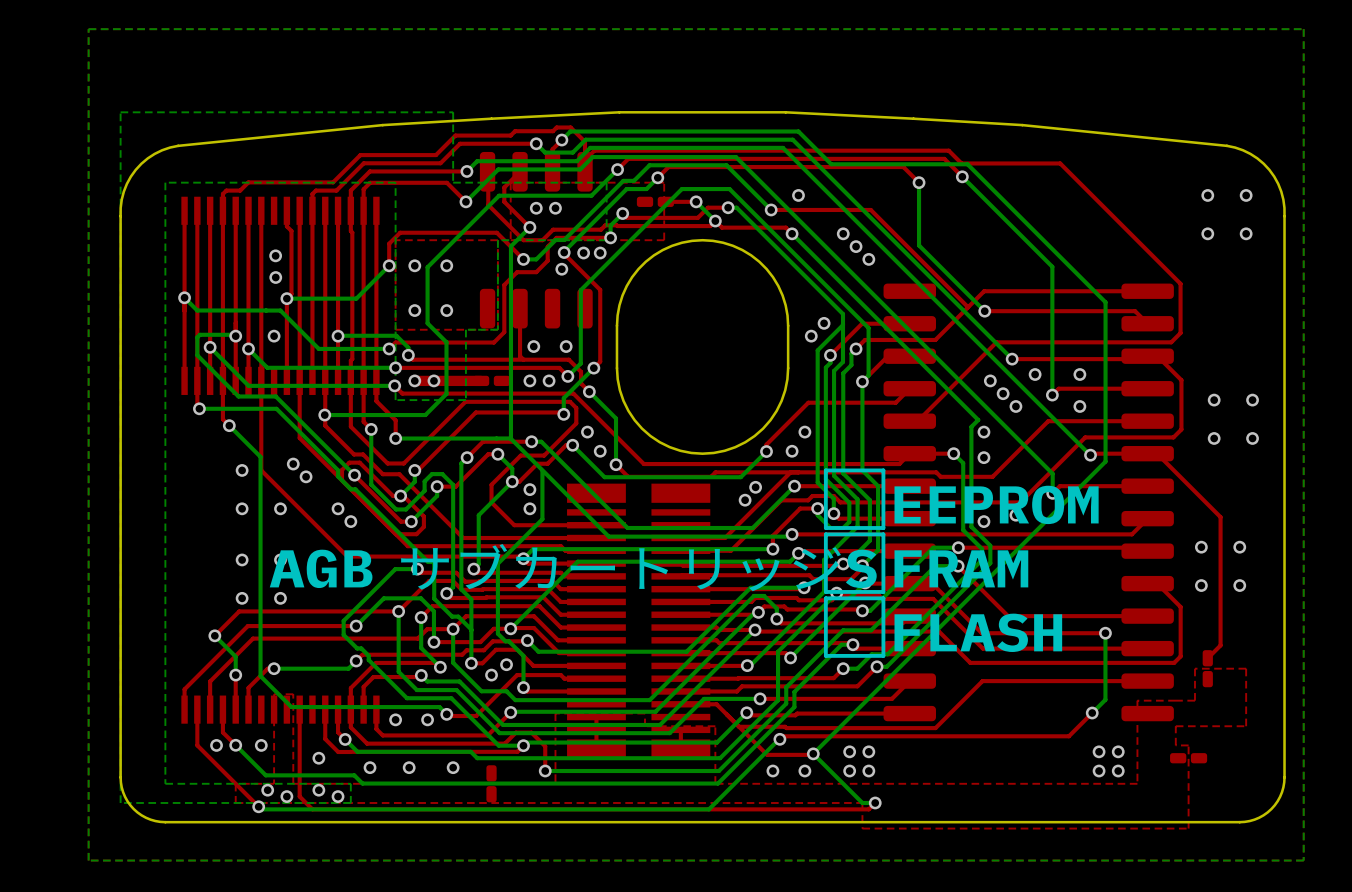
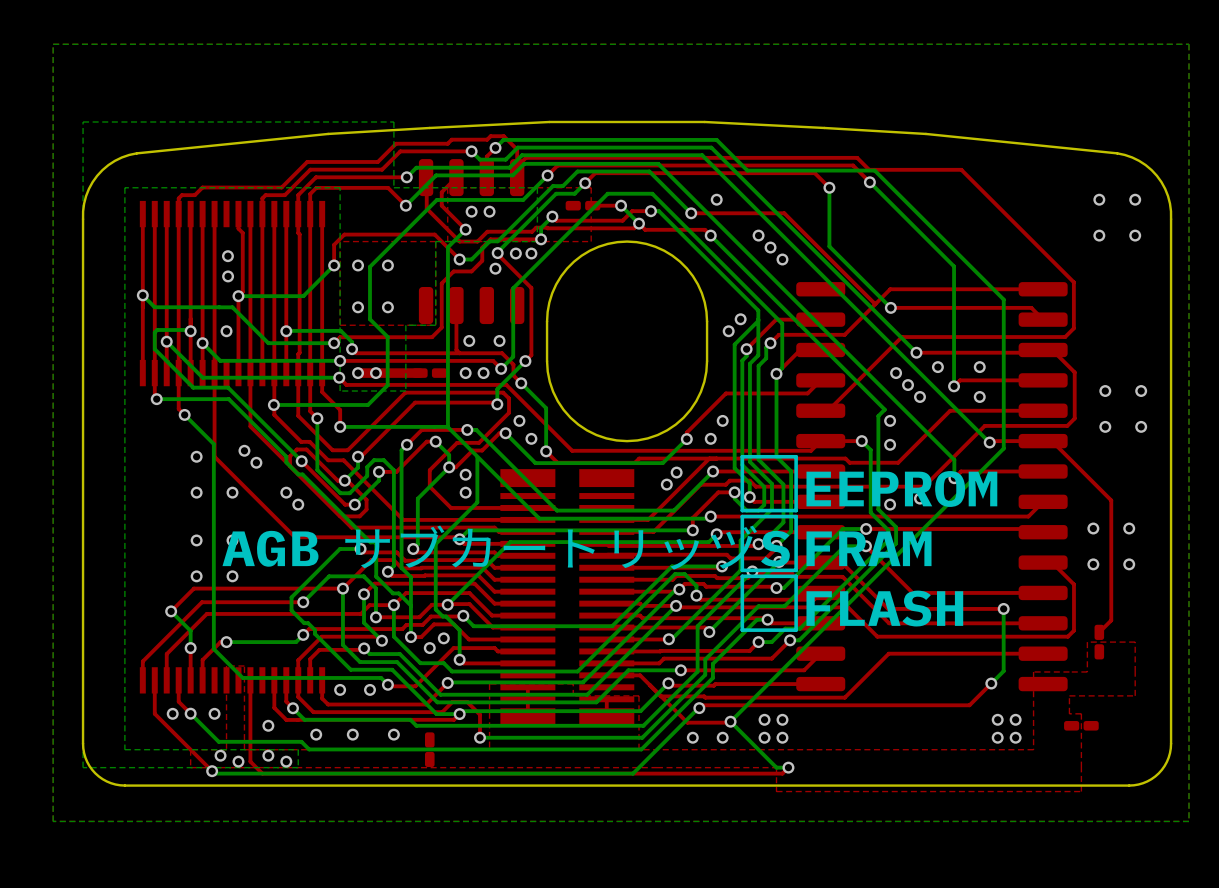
text: サブカートリッジS (638, 567) -> サブカートリッヅS (567, 547)

